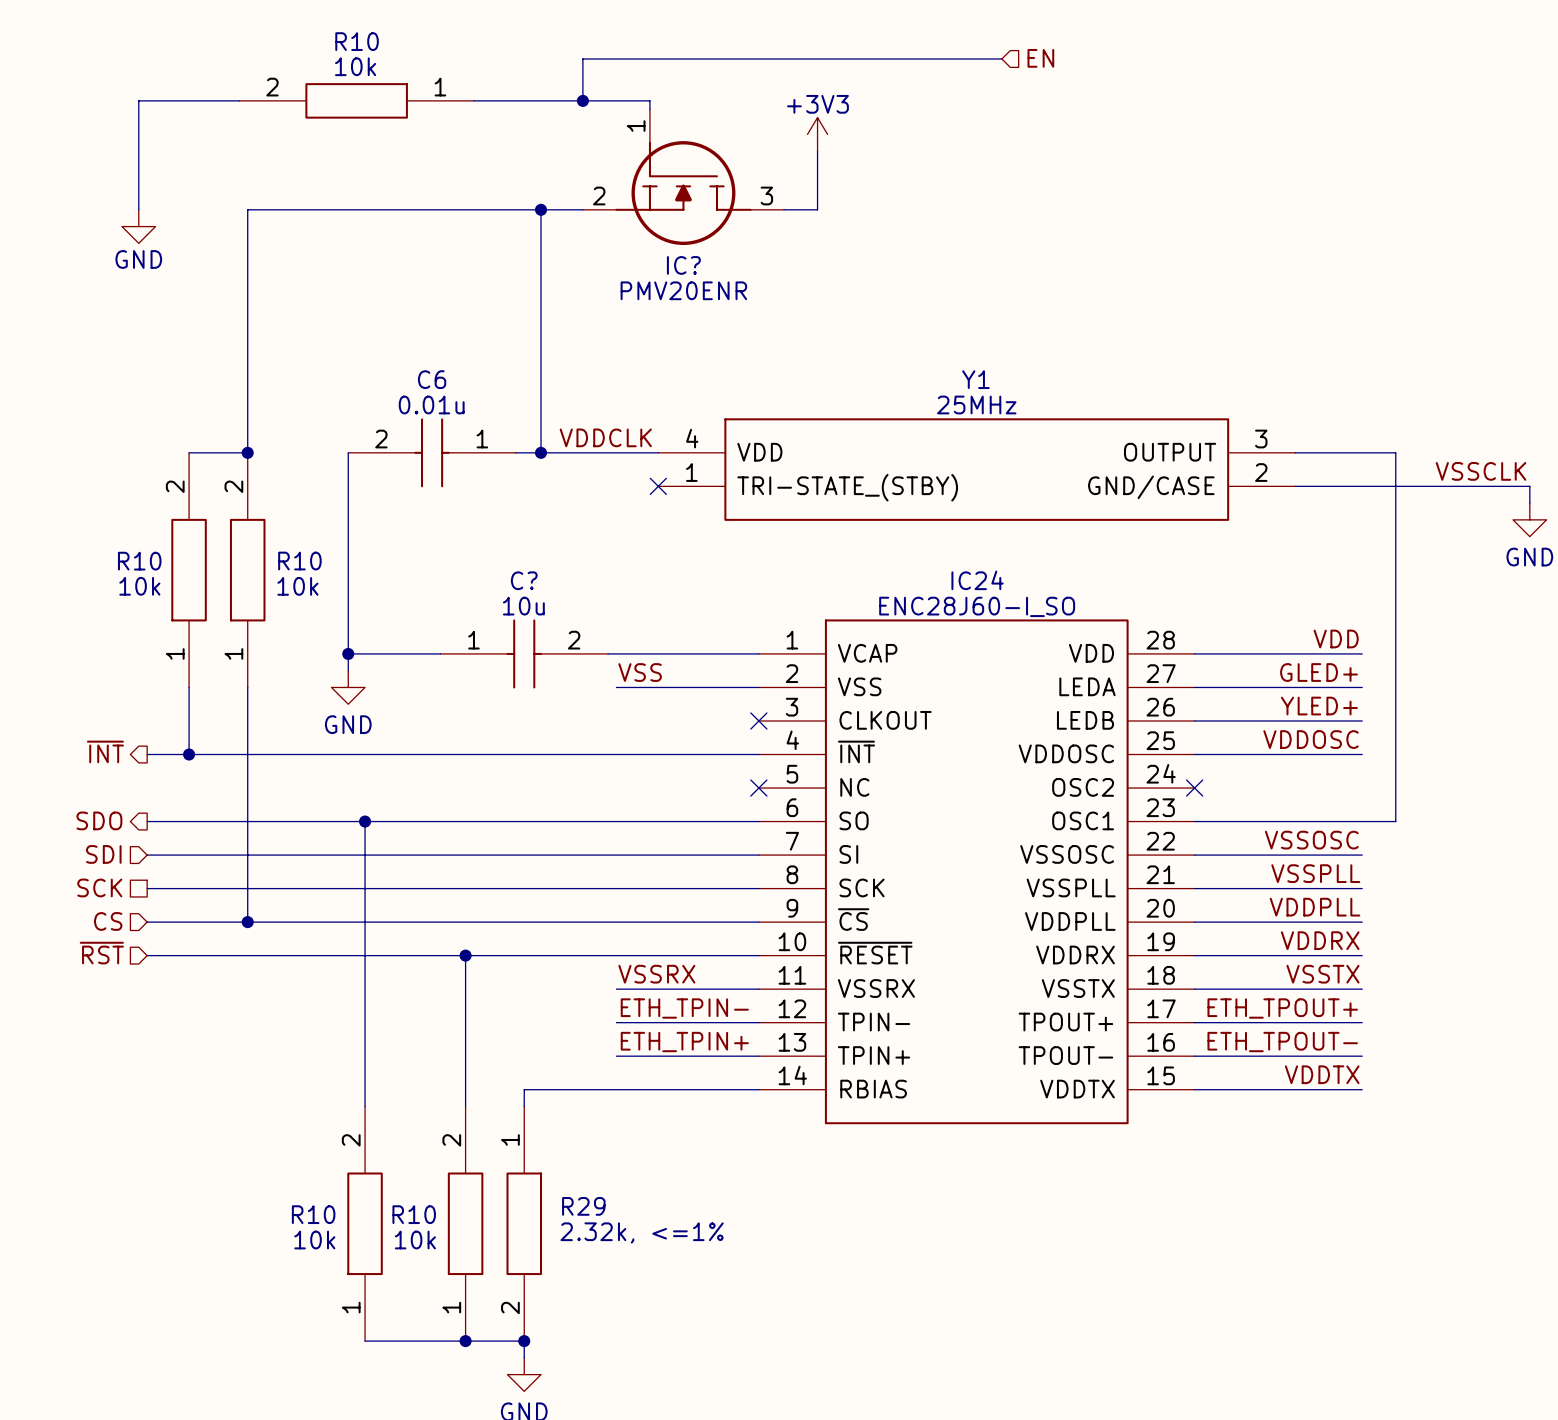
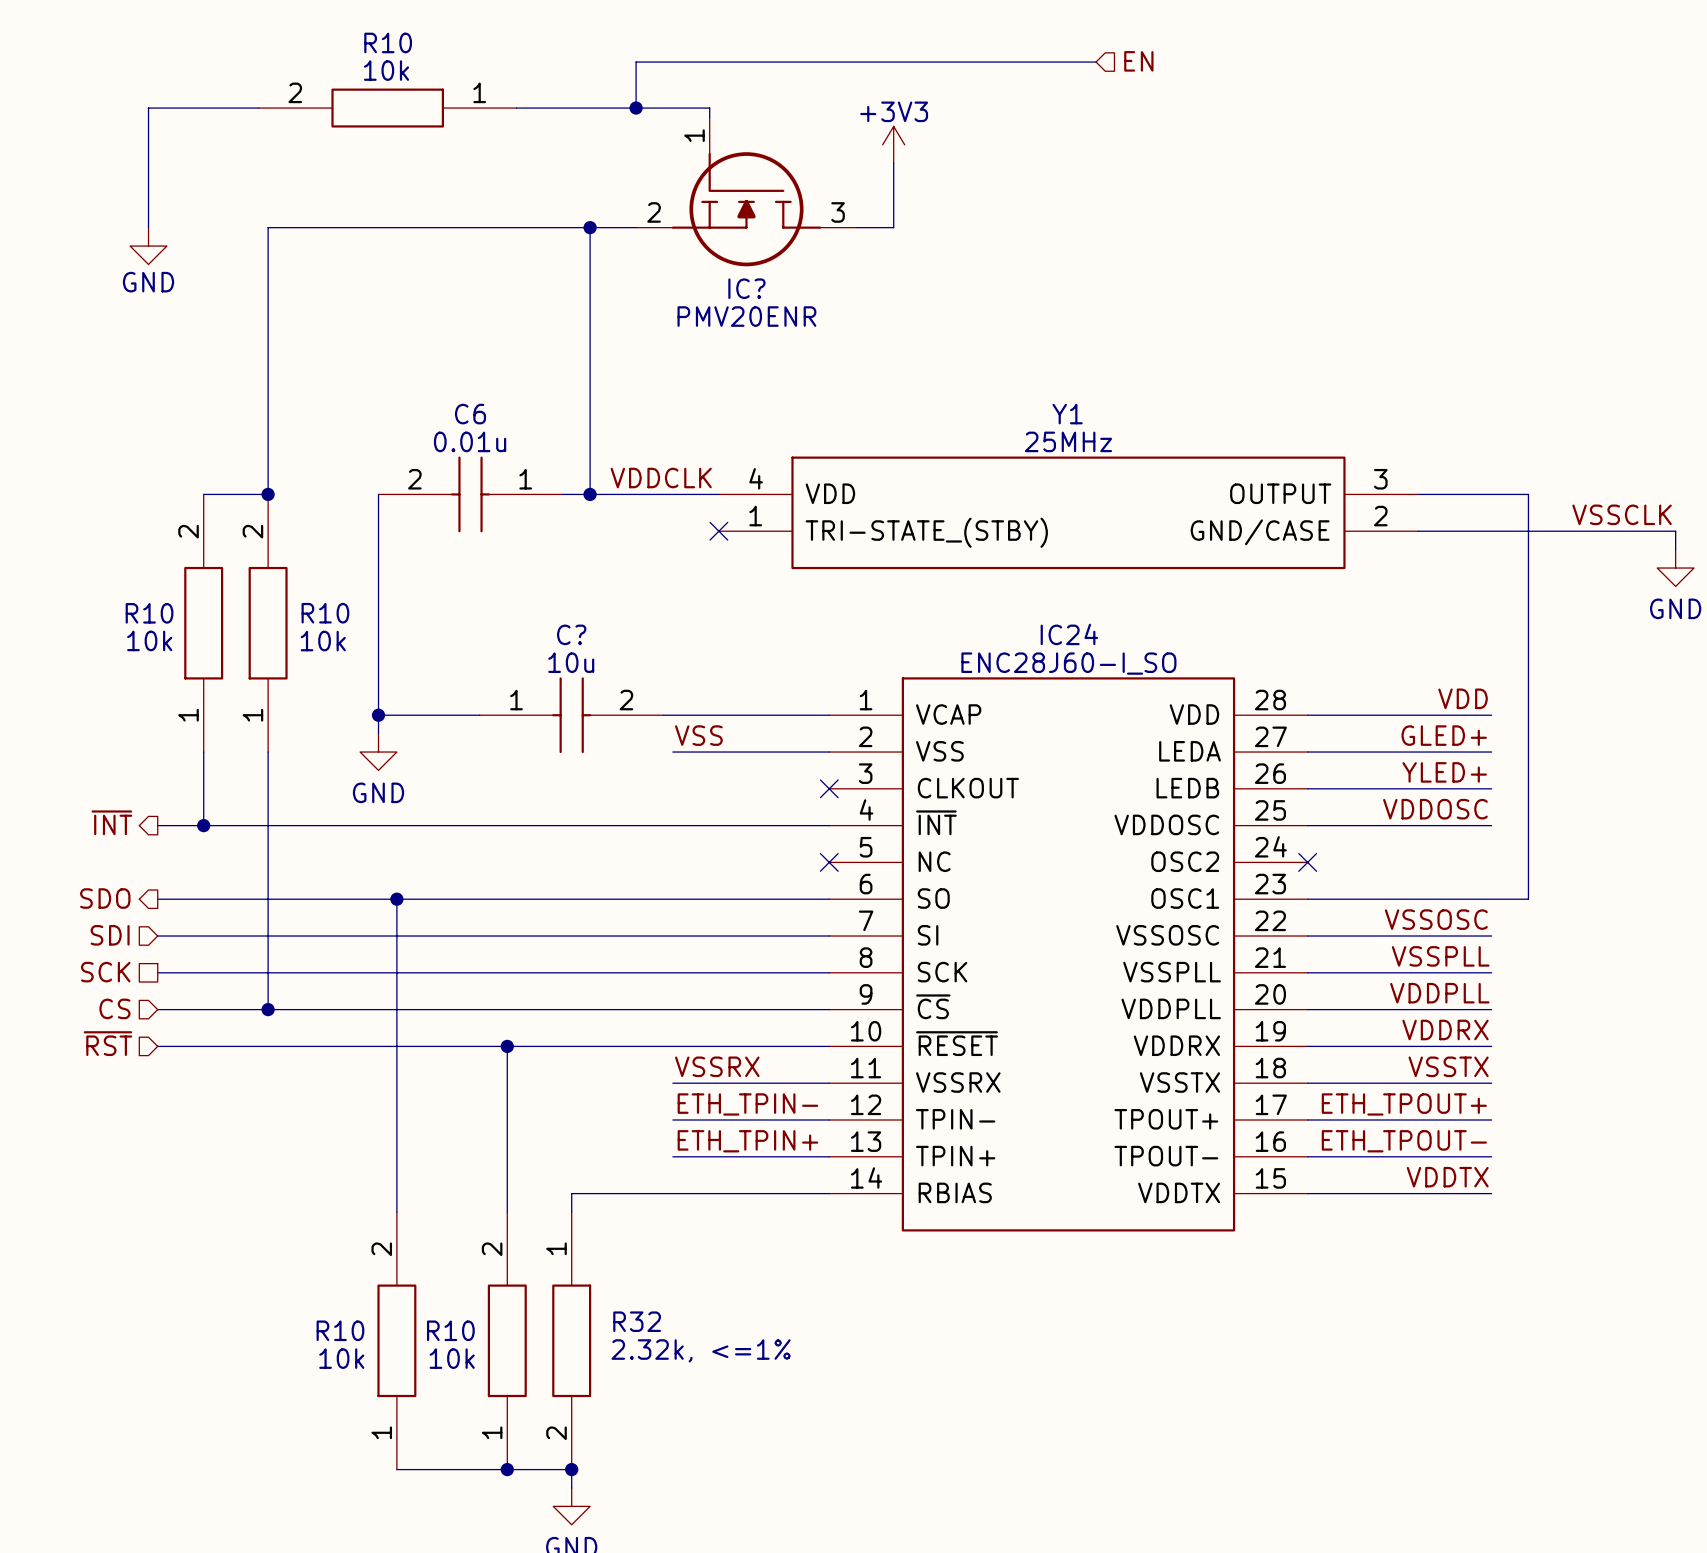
R29 name: R29 (583, 1206) -> R32 (637, 1321)

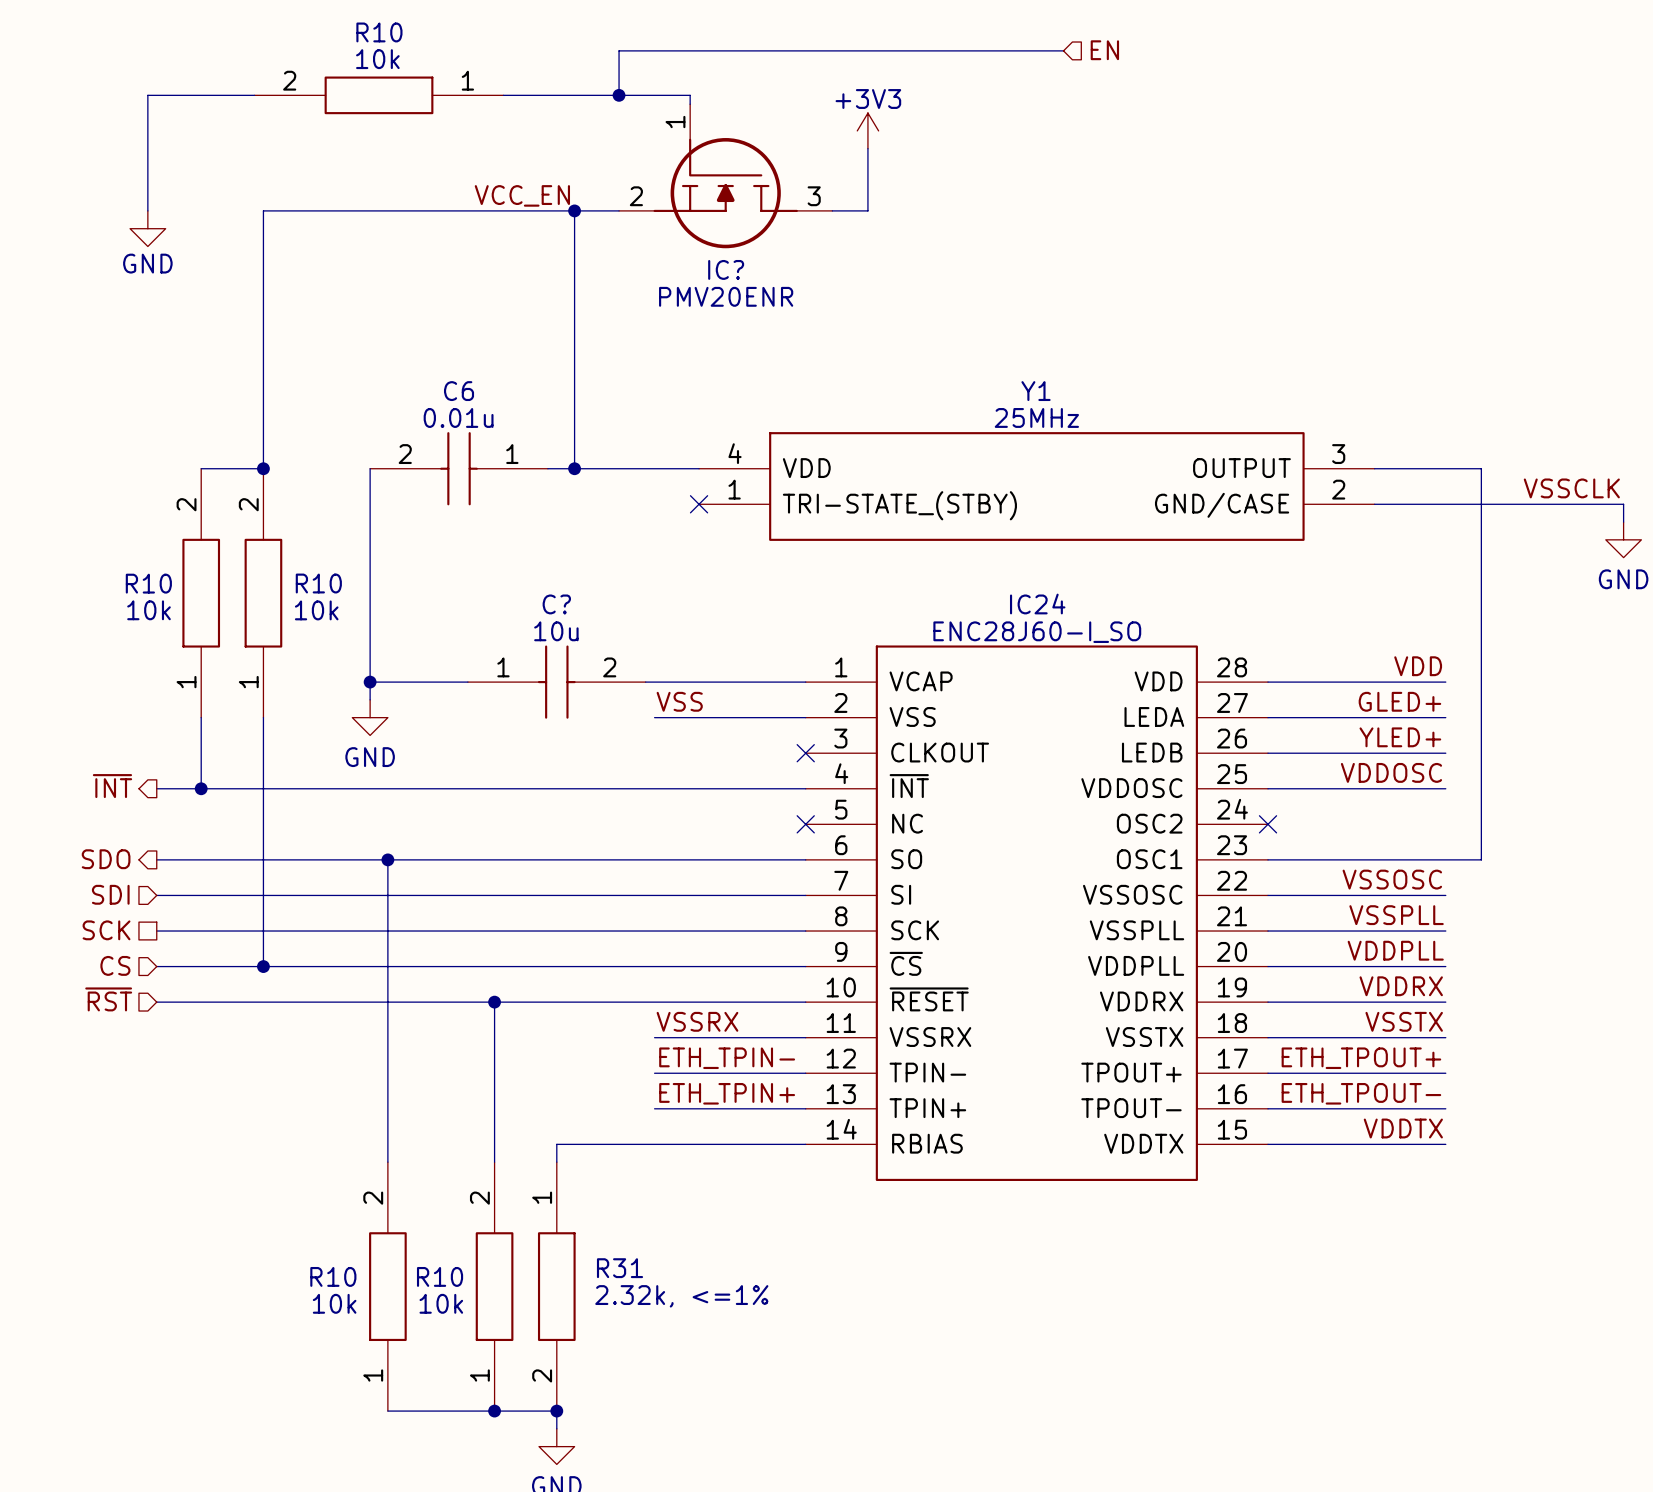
label: none -> VCC_EN (522, 195)
label: VDDCLK (661, 478) -> none
R32 name: R32 (637, 1321) -> R31 (620, 1268)

